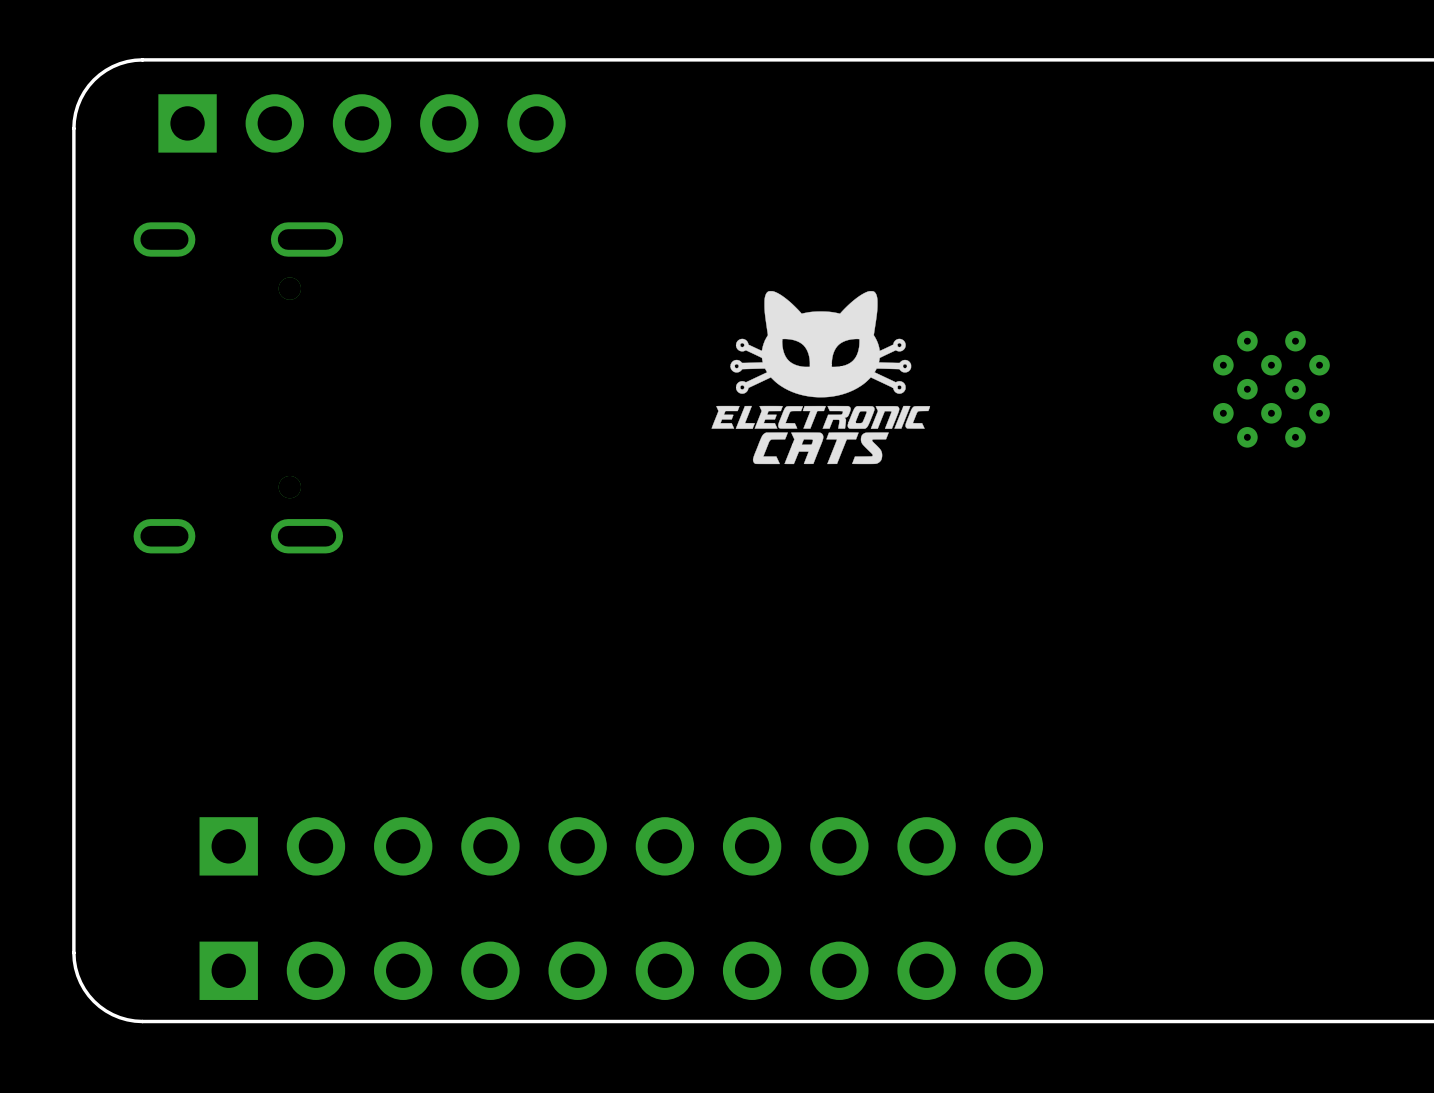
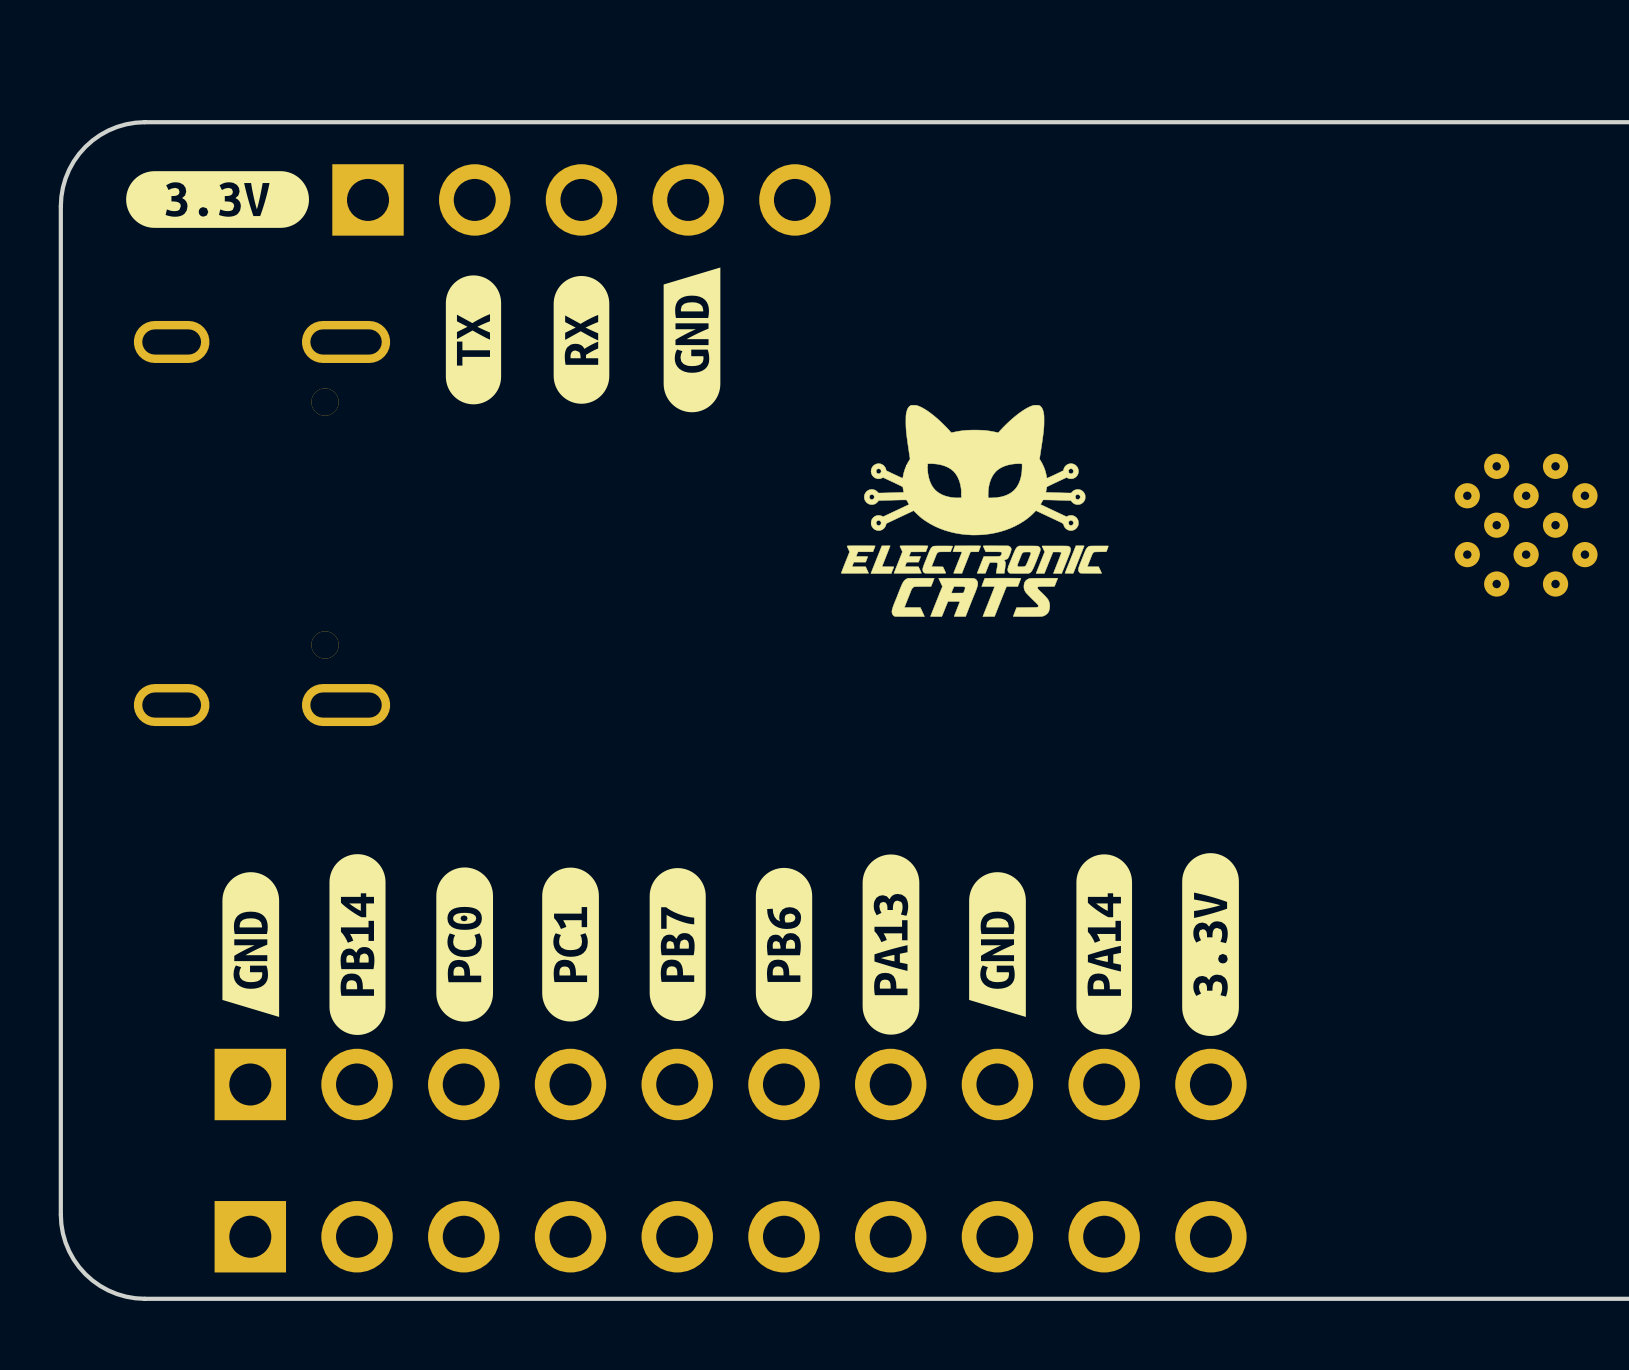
drawing: none -> [126, 171, 309, 228]
part position: (362, 123) -> (581, 199)
drawing: none -> [663, 267, 721, 413]
drawing: none -> [445, 275, 502, 405]
drawing: none -> [553, 275, 610, 404]
drawing: none -> [1076, 853, 1239, 1036]
drawing: none -> [222, 854, 386, 1035]
drawing: none -> [649, 854, 1026, 1035]
drawing: none -> [436, 867, 599, 1022]

